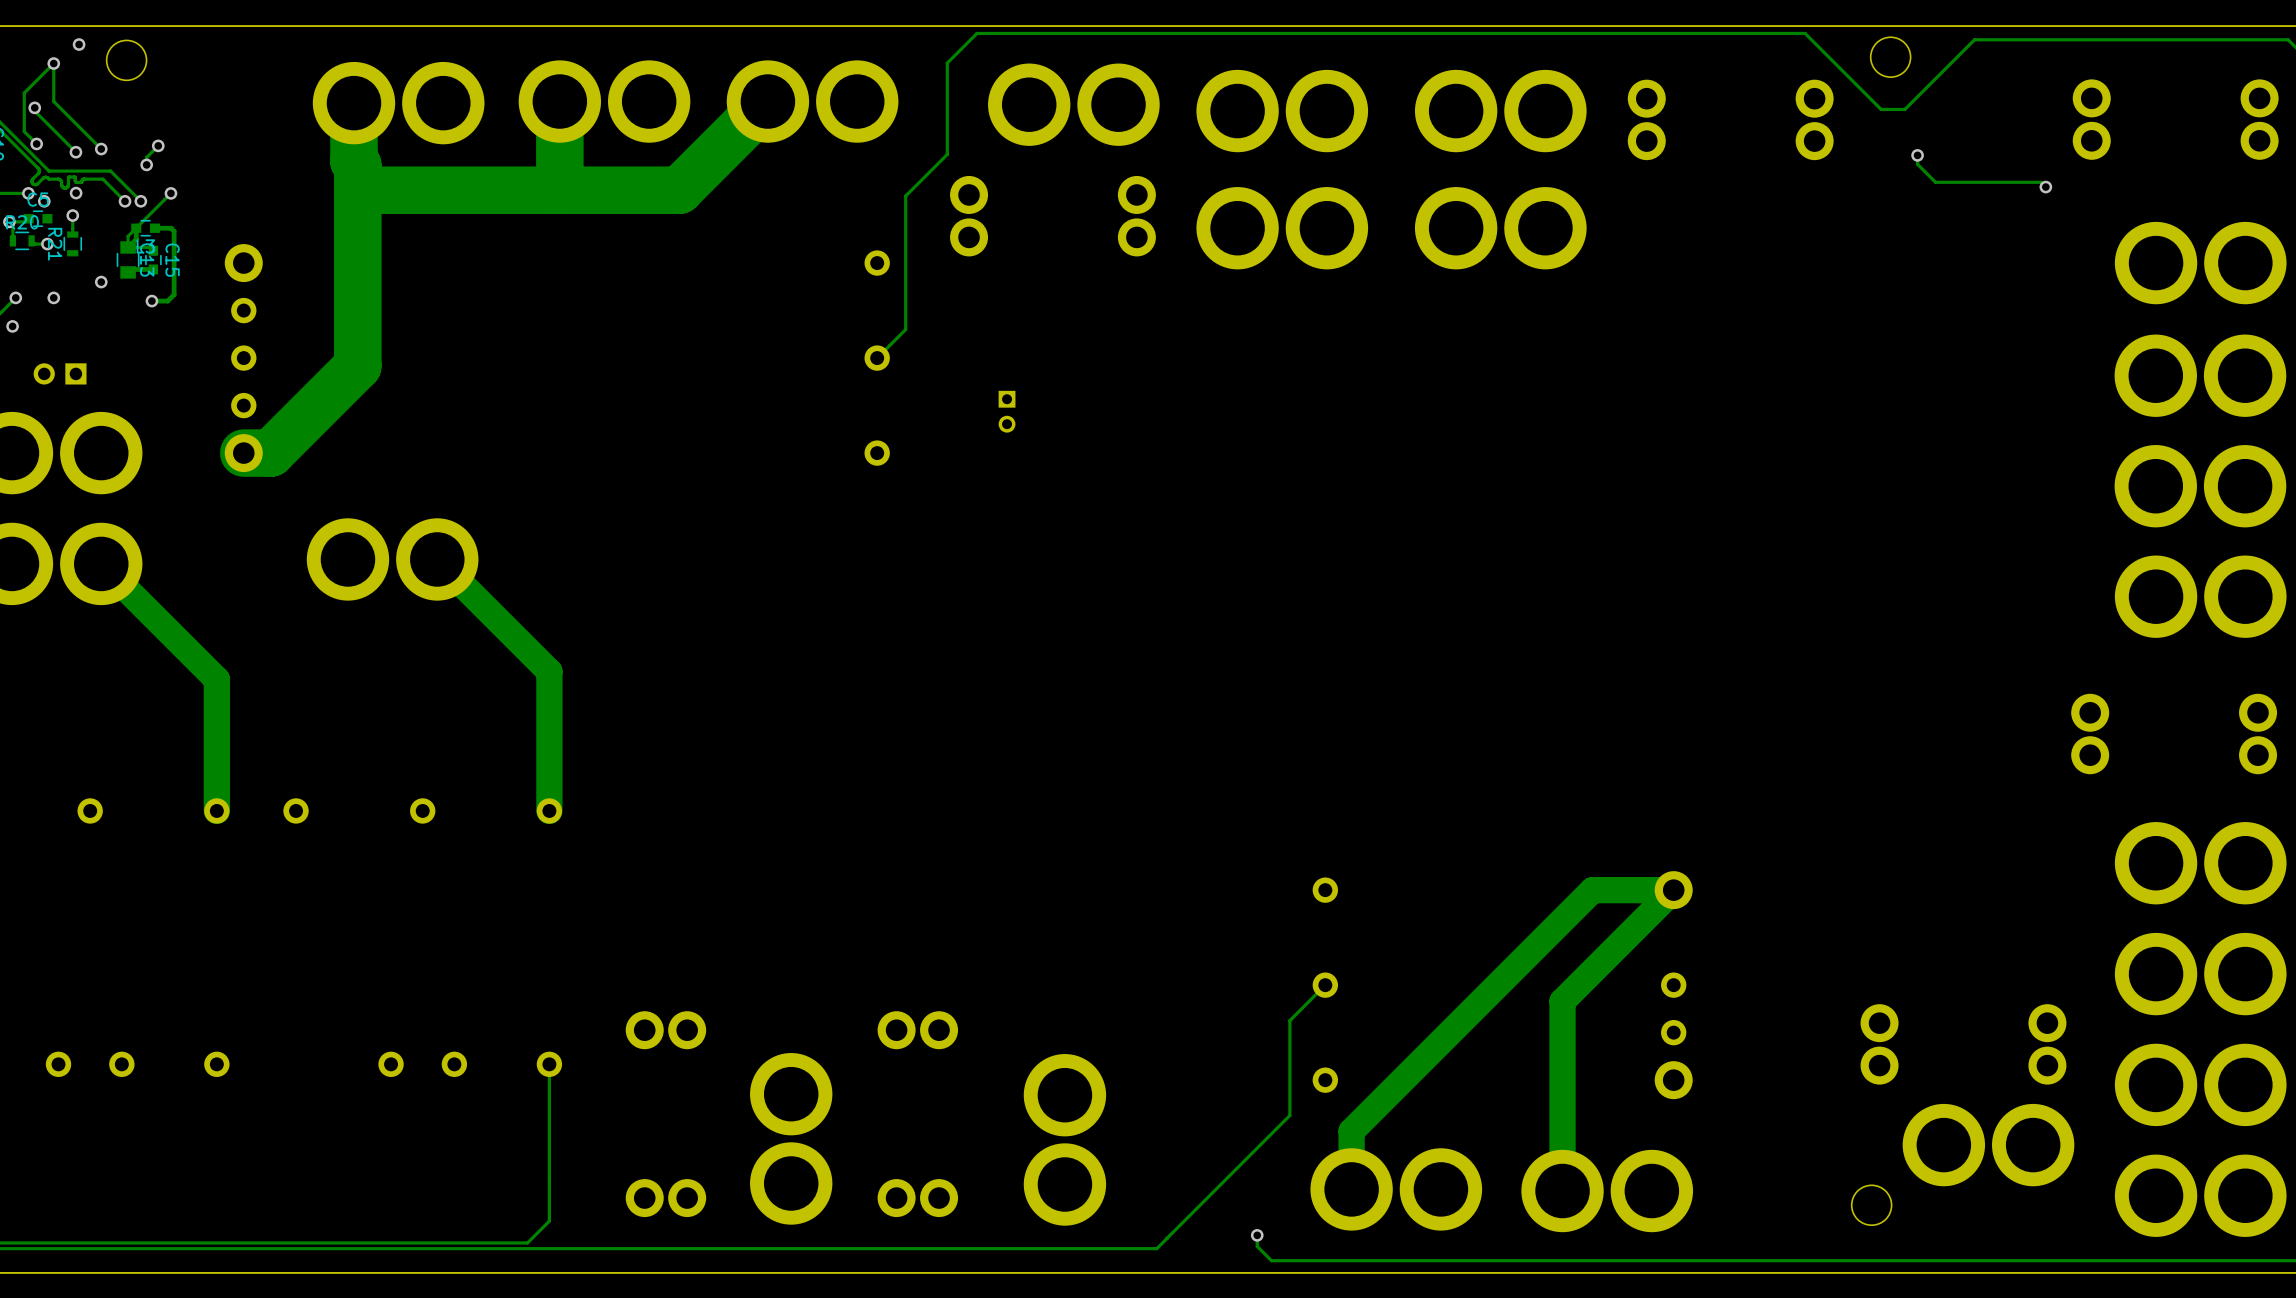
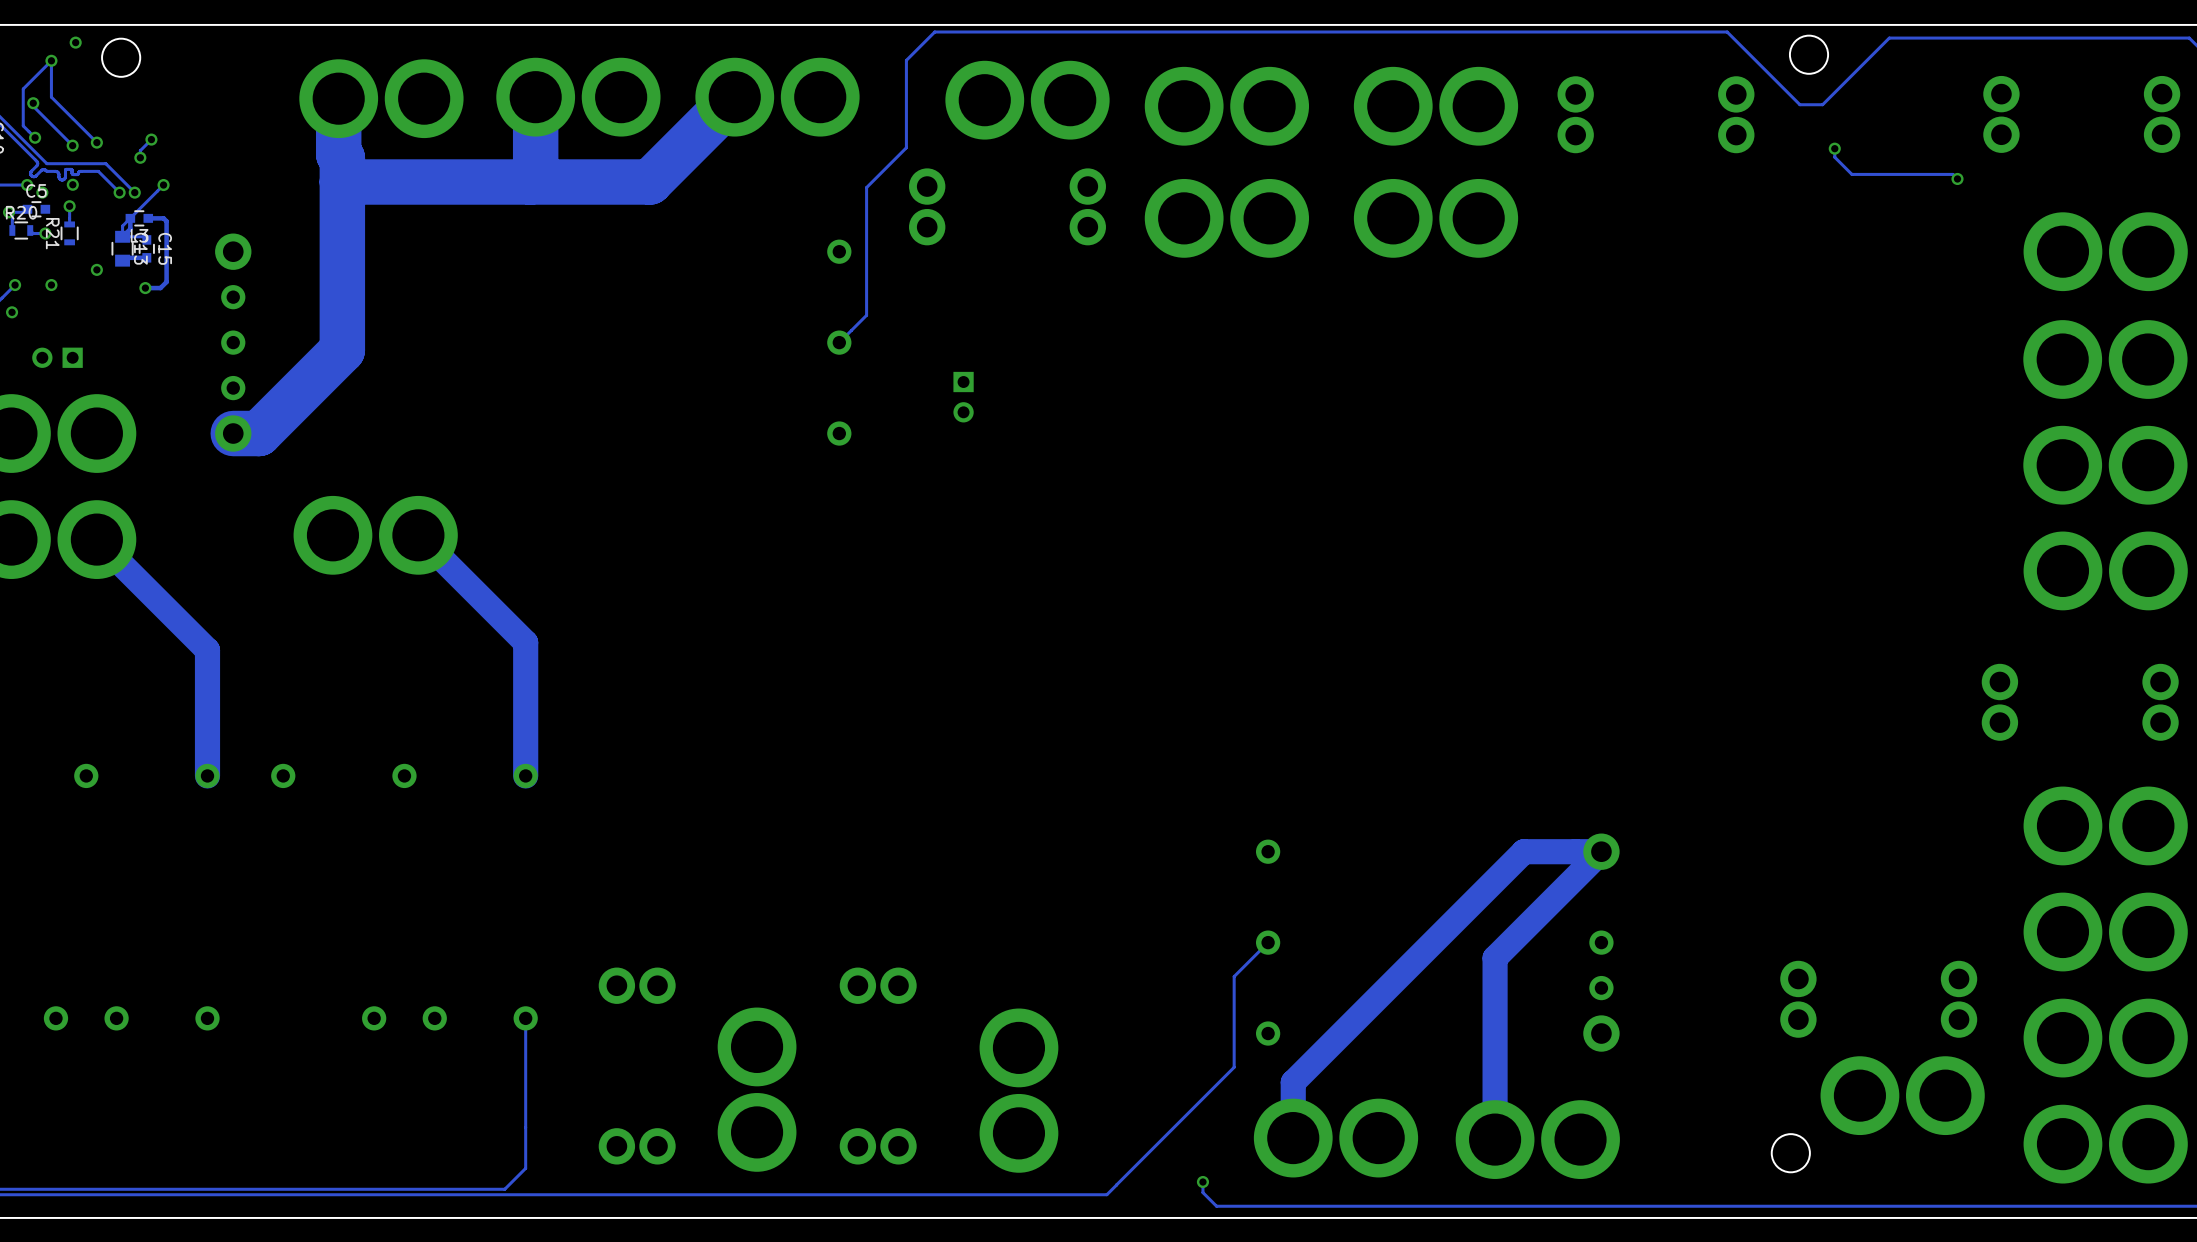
part footprint: [998, 390, 1016, 433] -> [953, 371, 974, 423]

